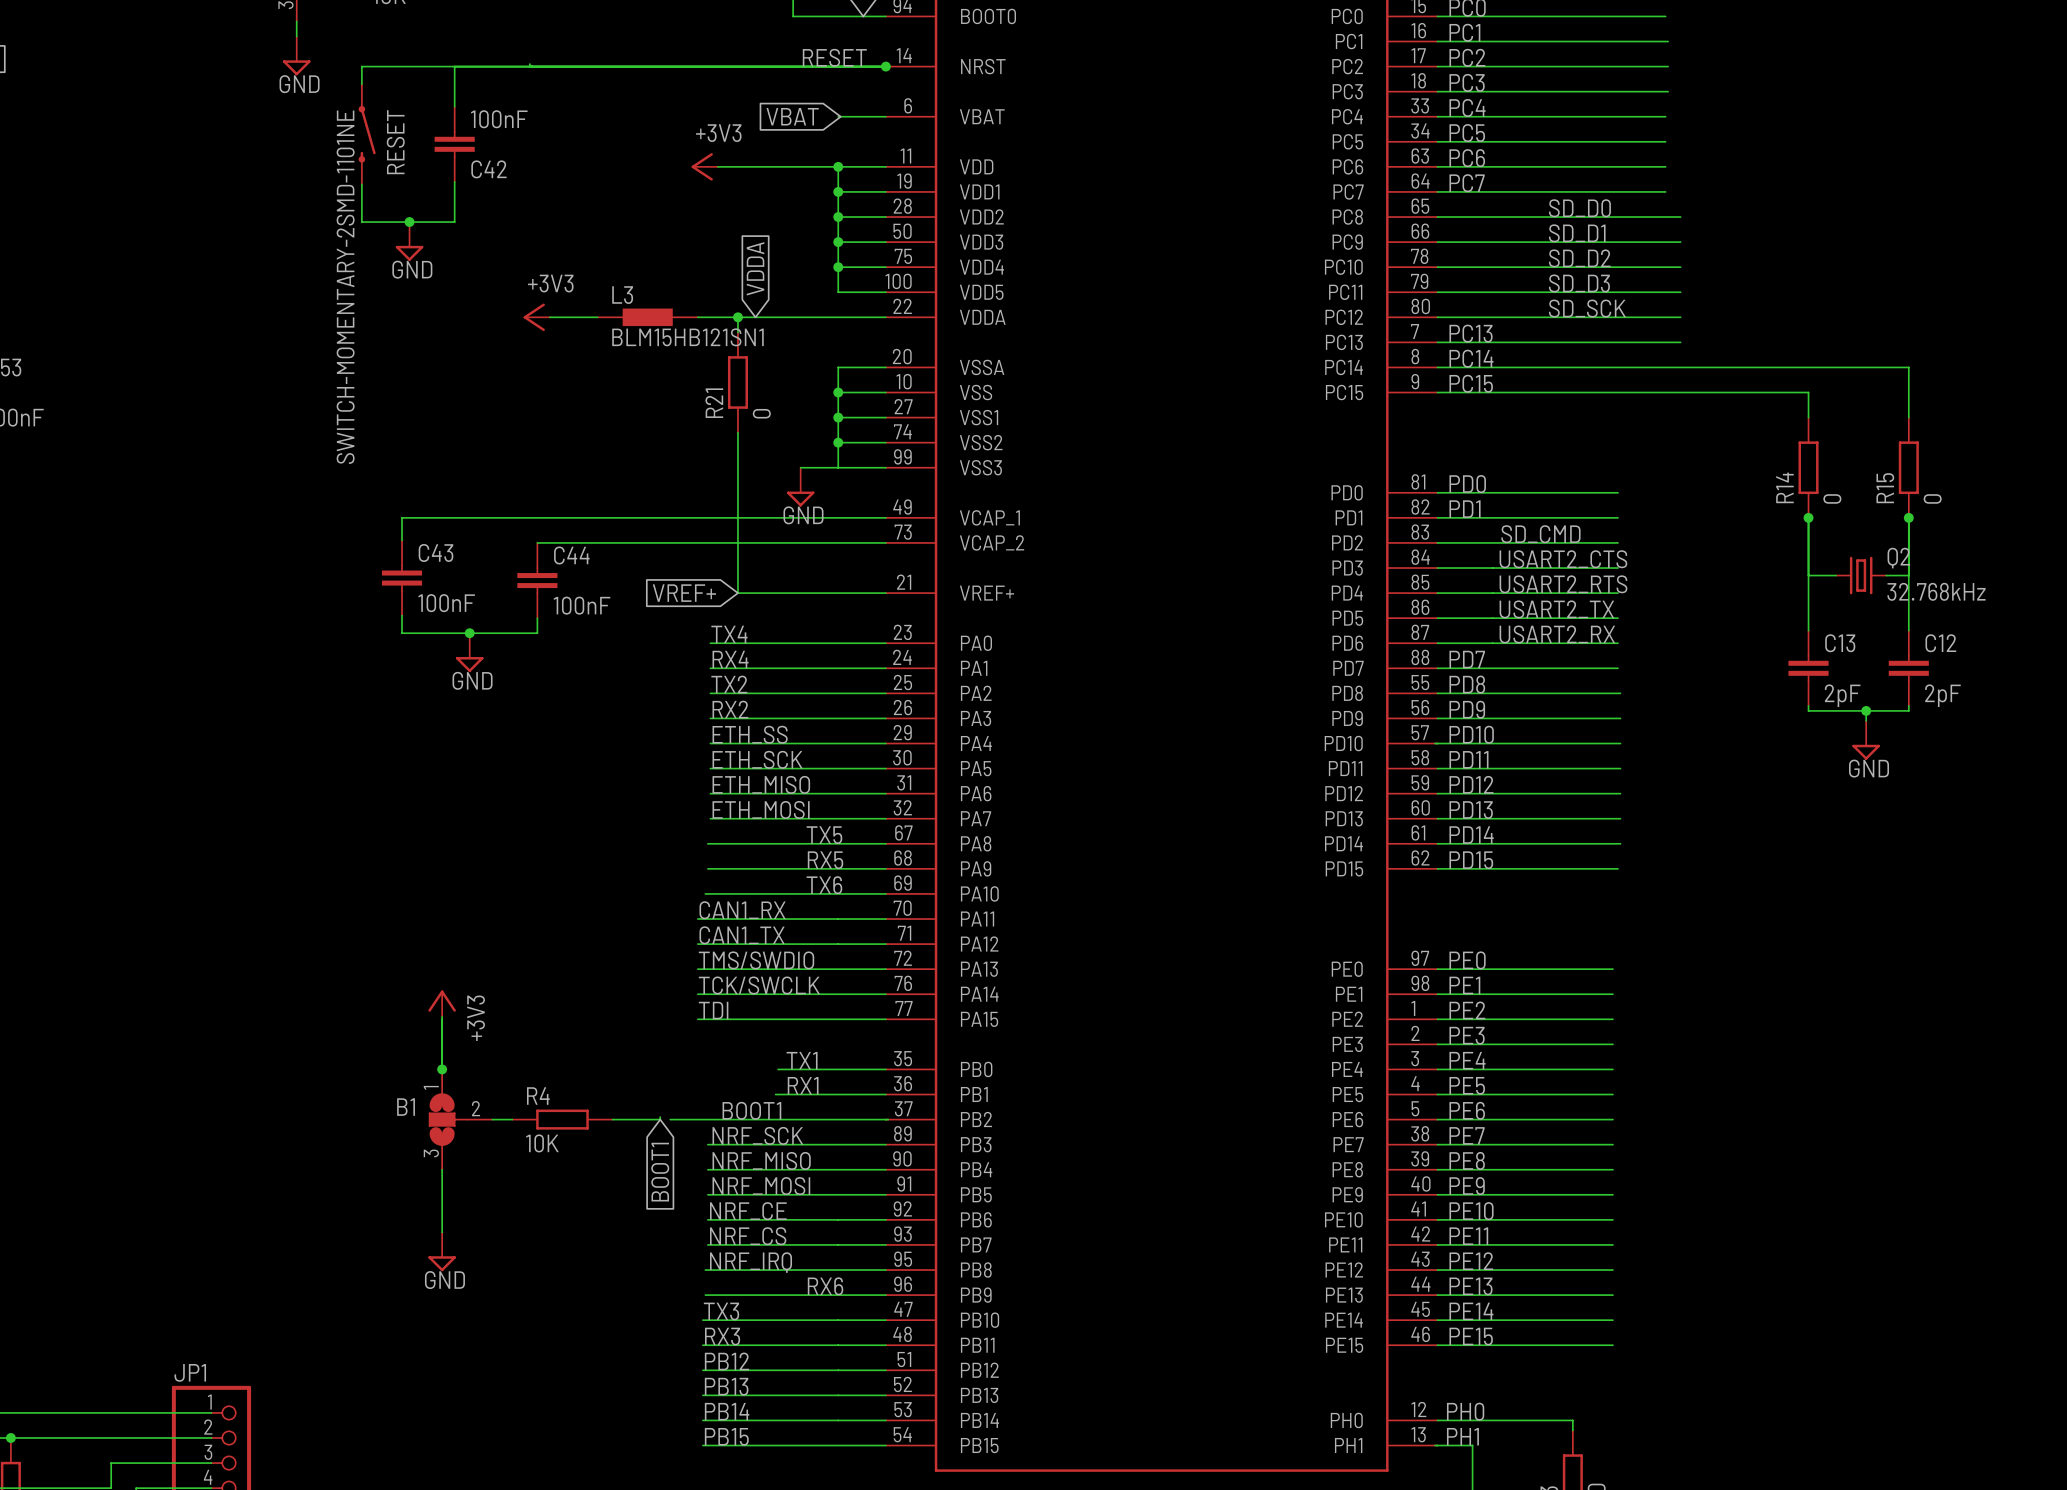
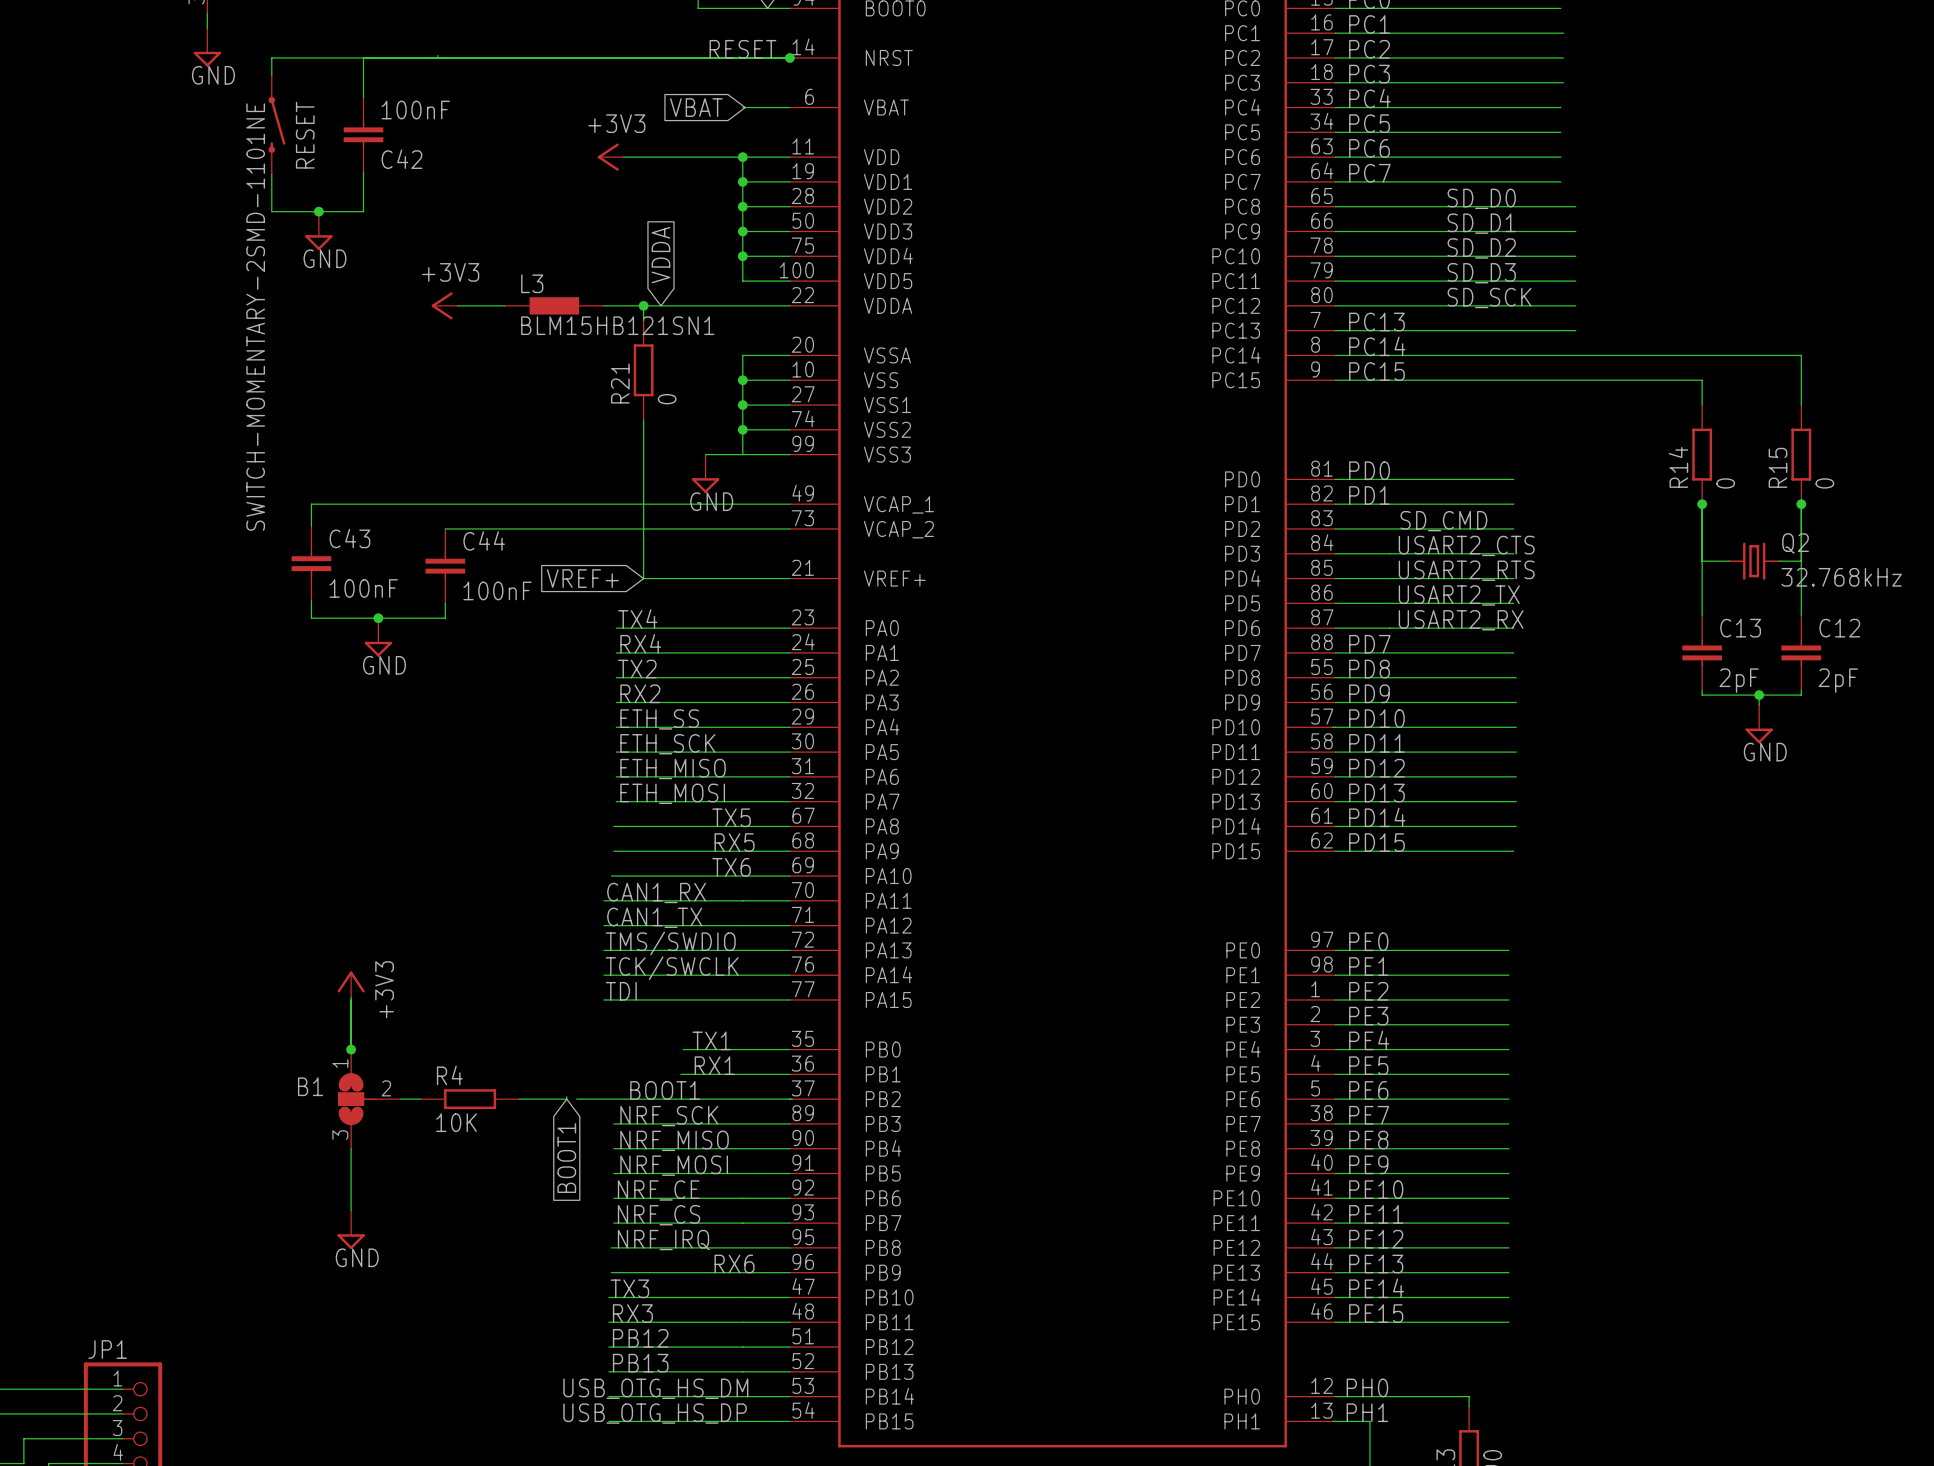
label: PB14 (727, 1411) -> none
label: none -> USB_OTG_HS_DM (655, 1388)
label: PB15 (726, 1436) -> none
label: none -> USB_OTG_HS_DP (655, 1413)

